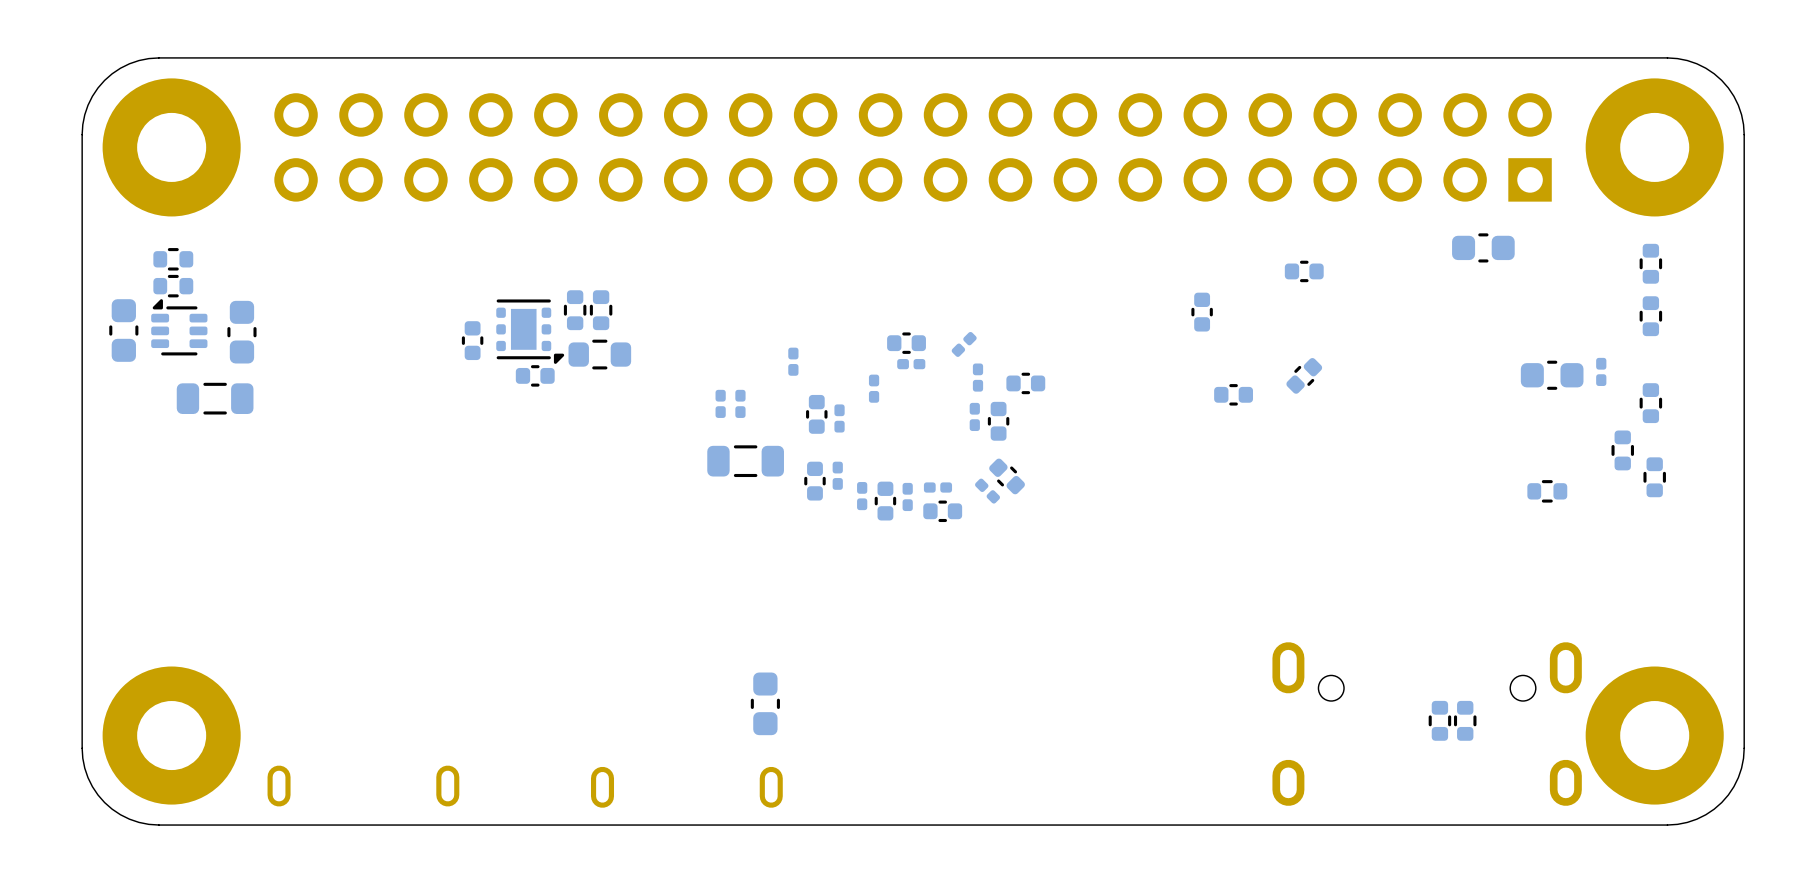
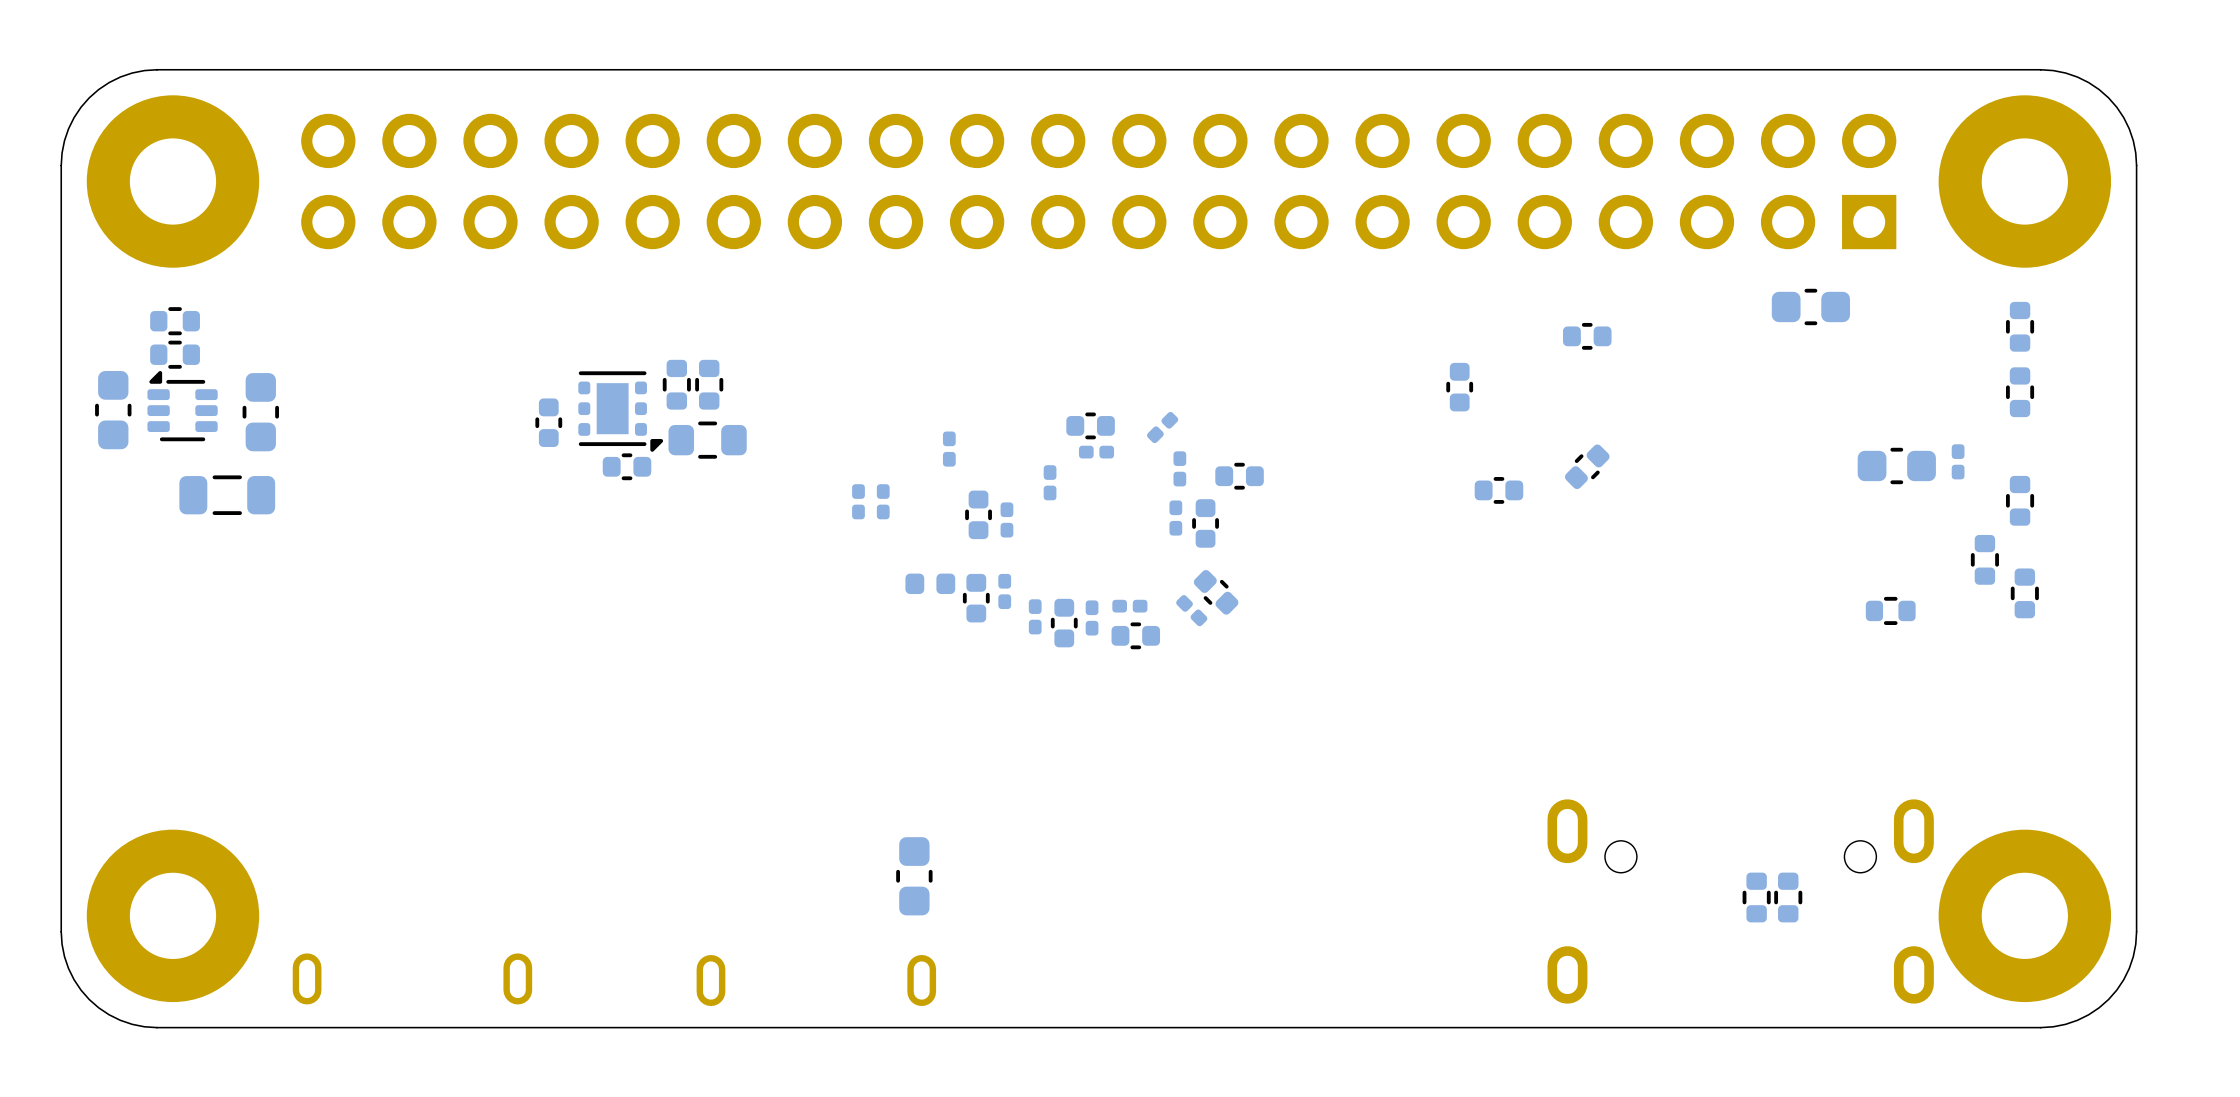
part: (745, 461) -> none
part: none -> (930, 583)

